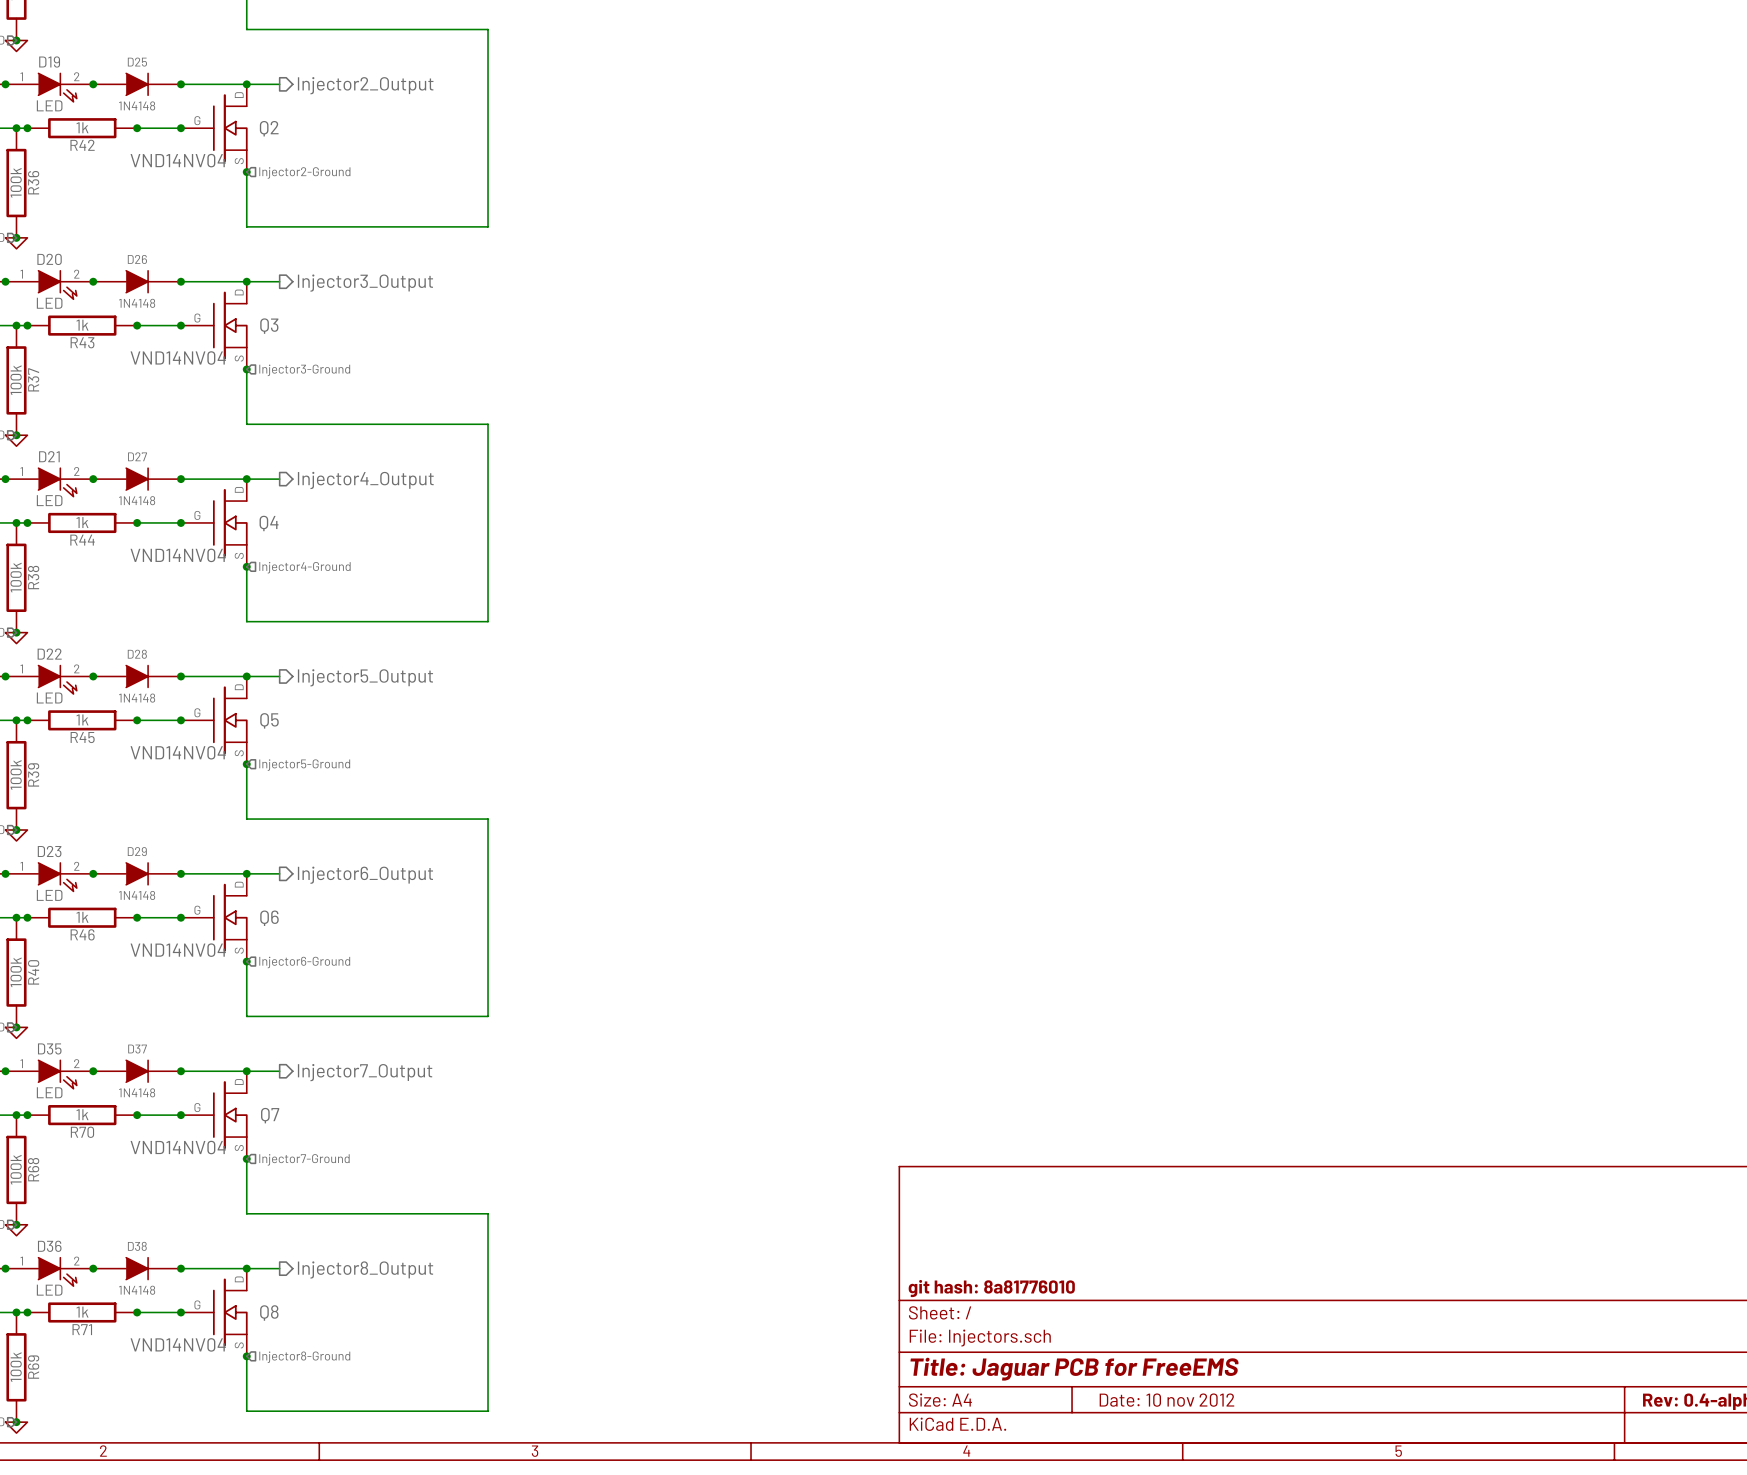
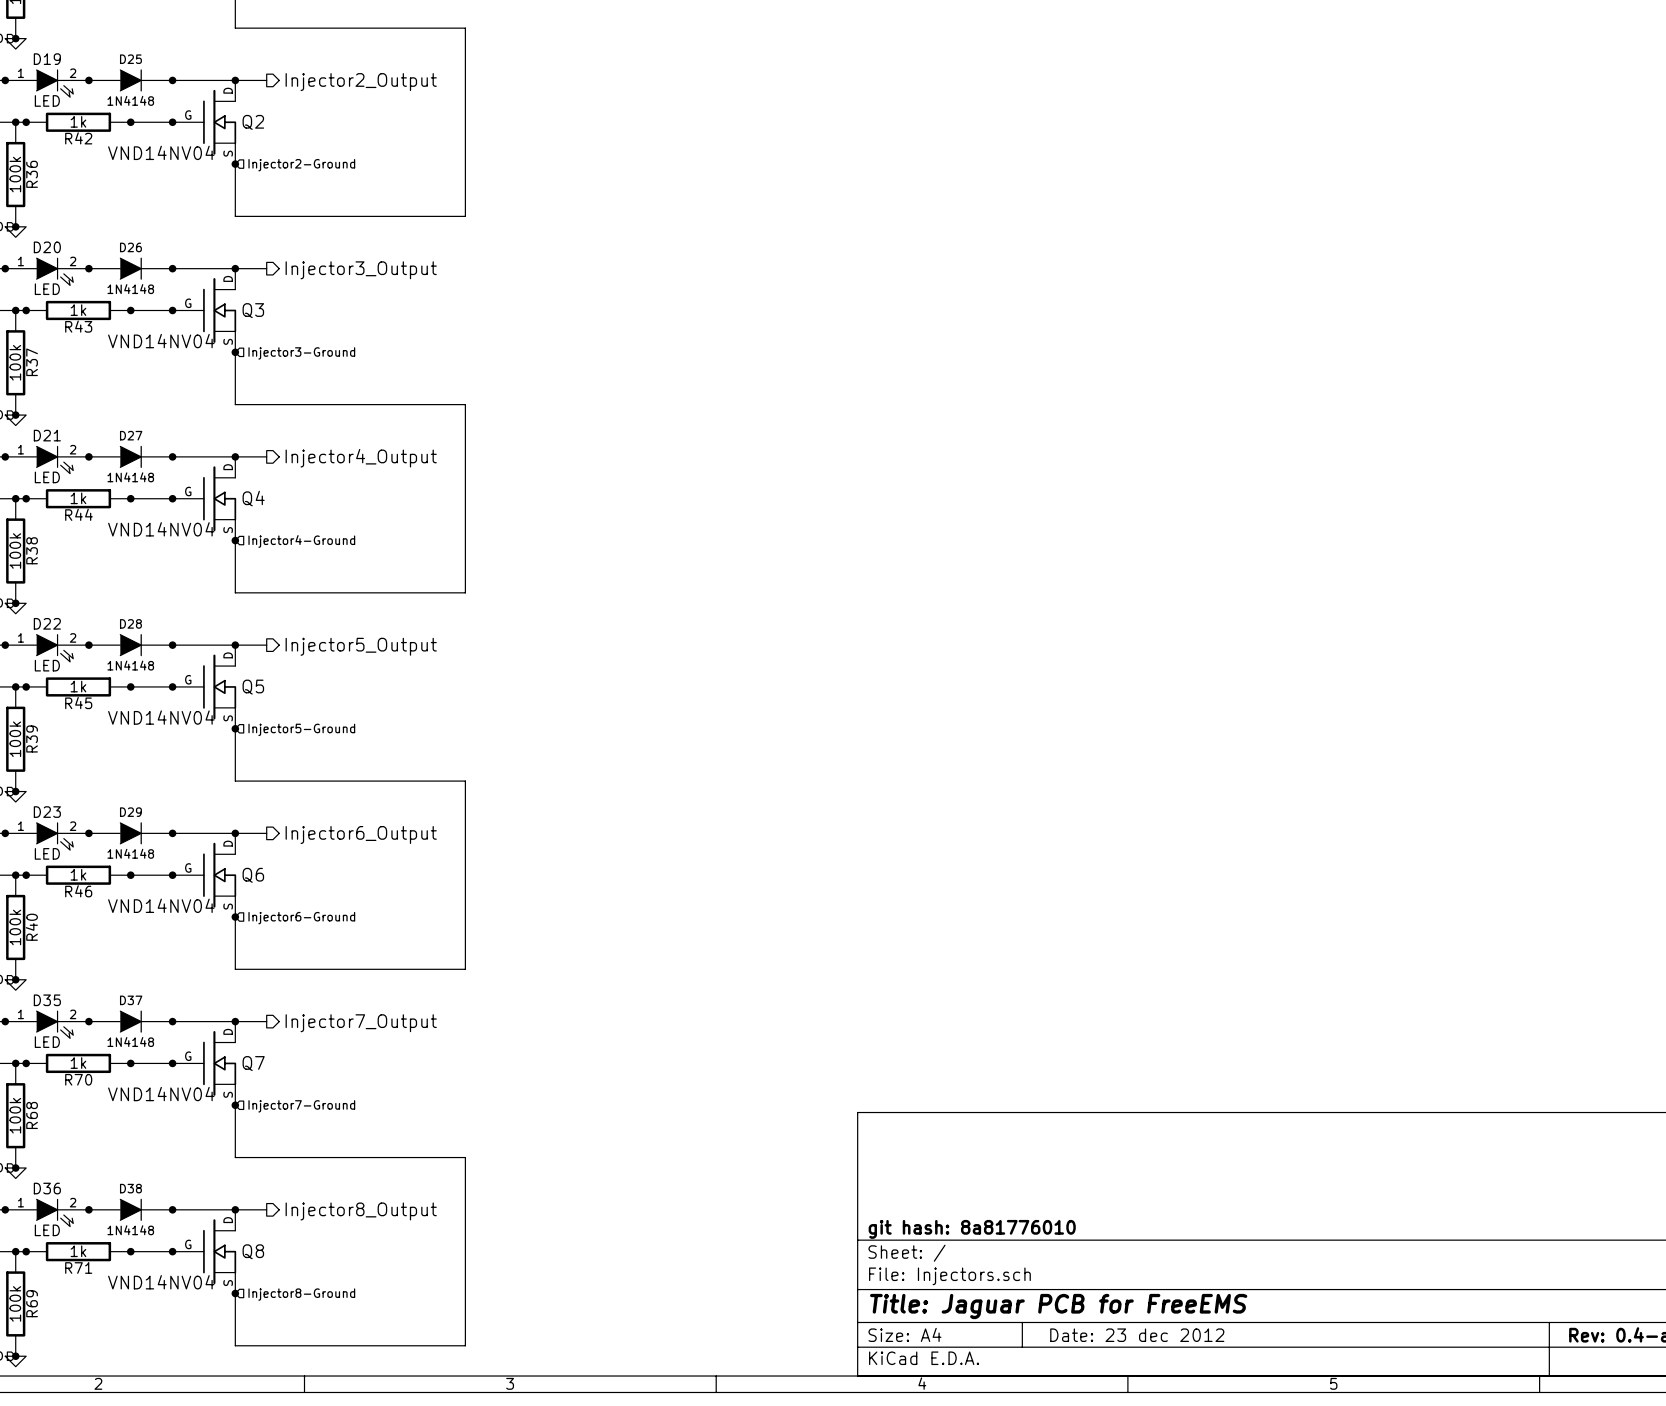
title block: Date: 10 nov 2012 (1166, 1400) -> Date: 23 dec 2012 (1137, 1335)

